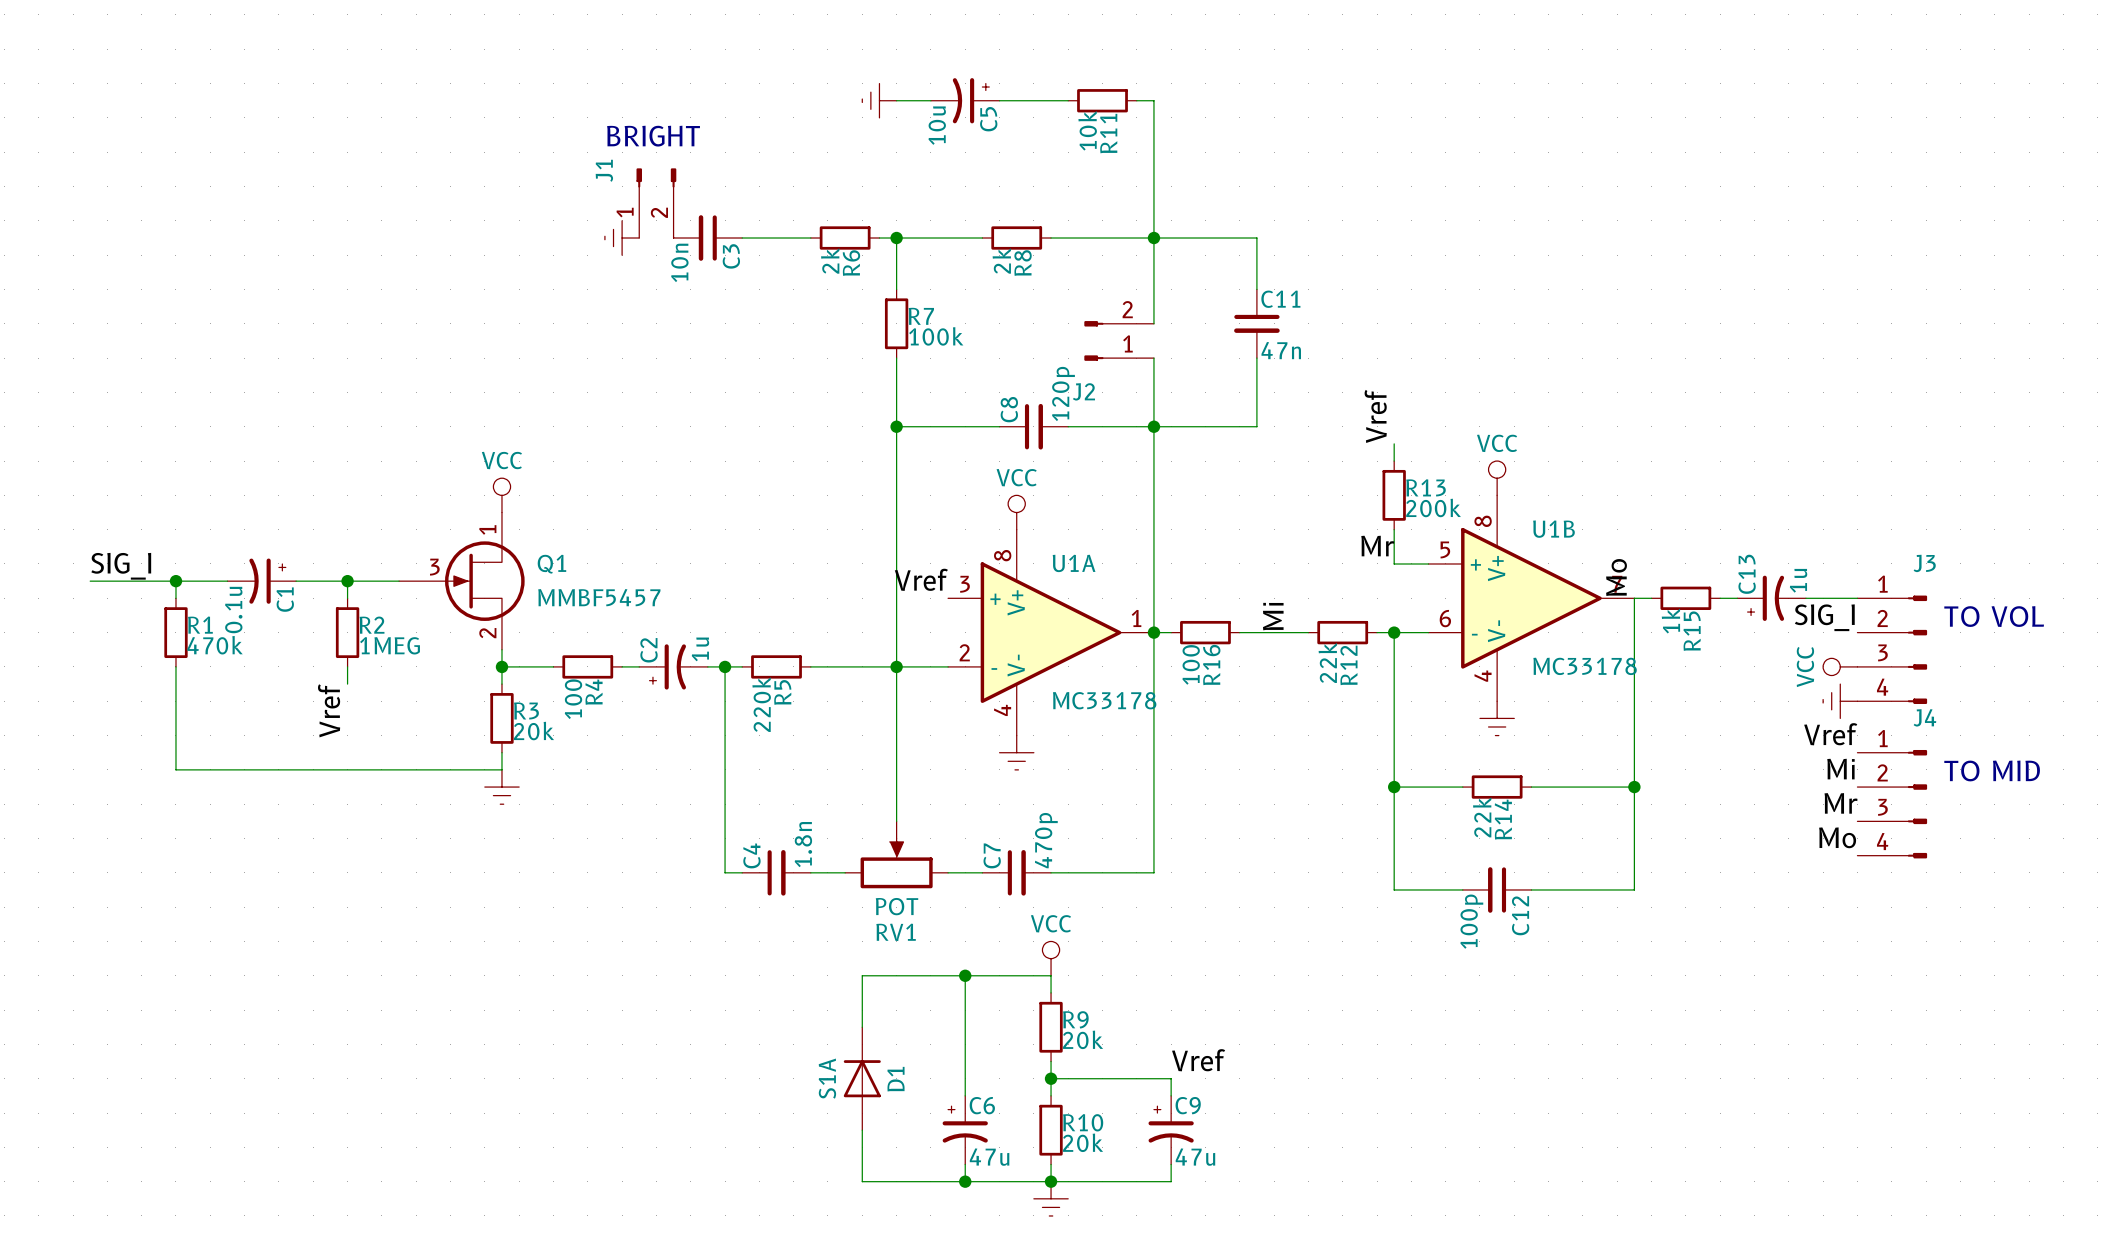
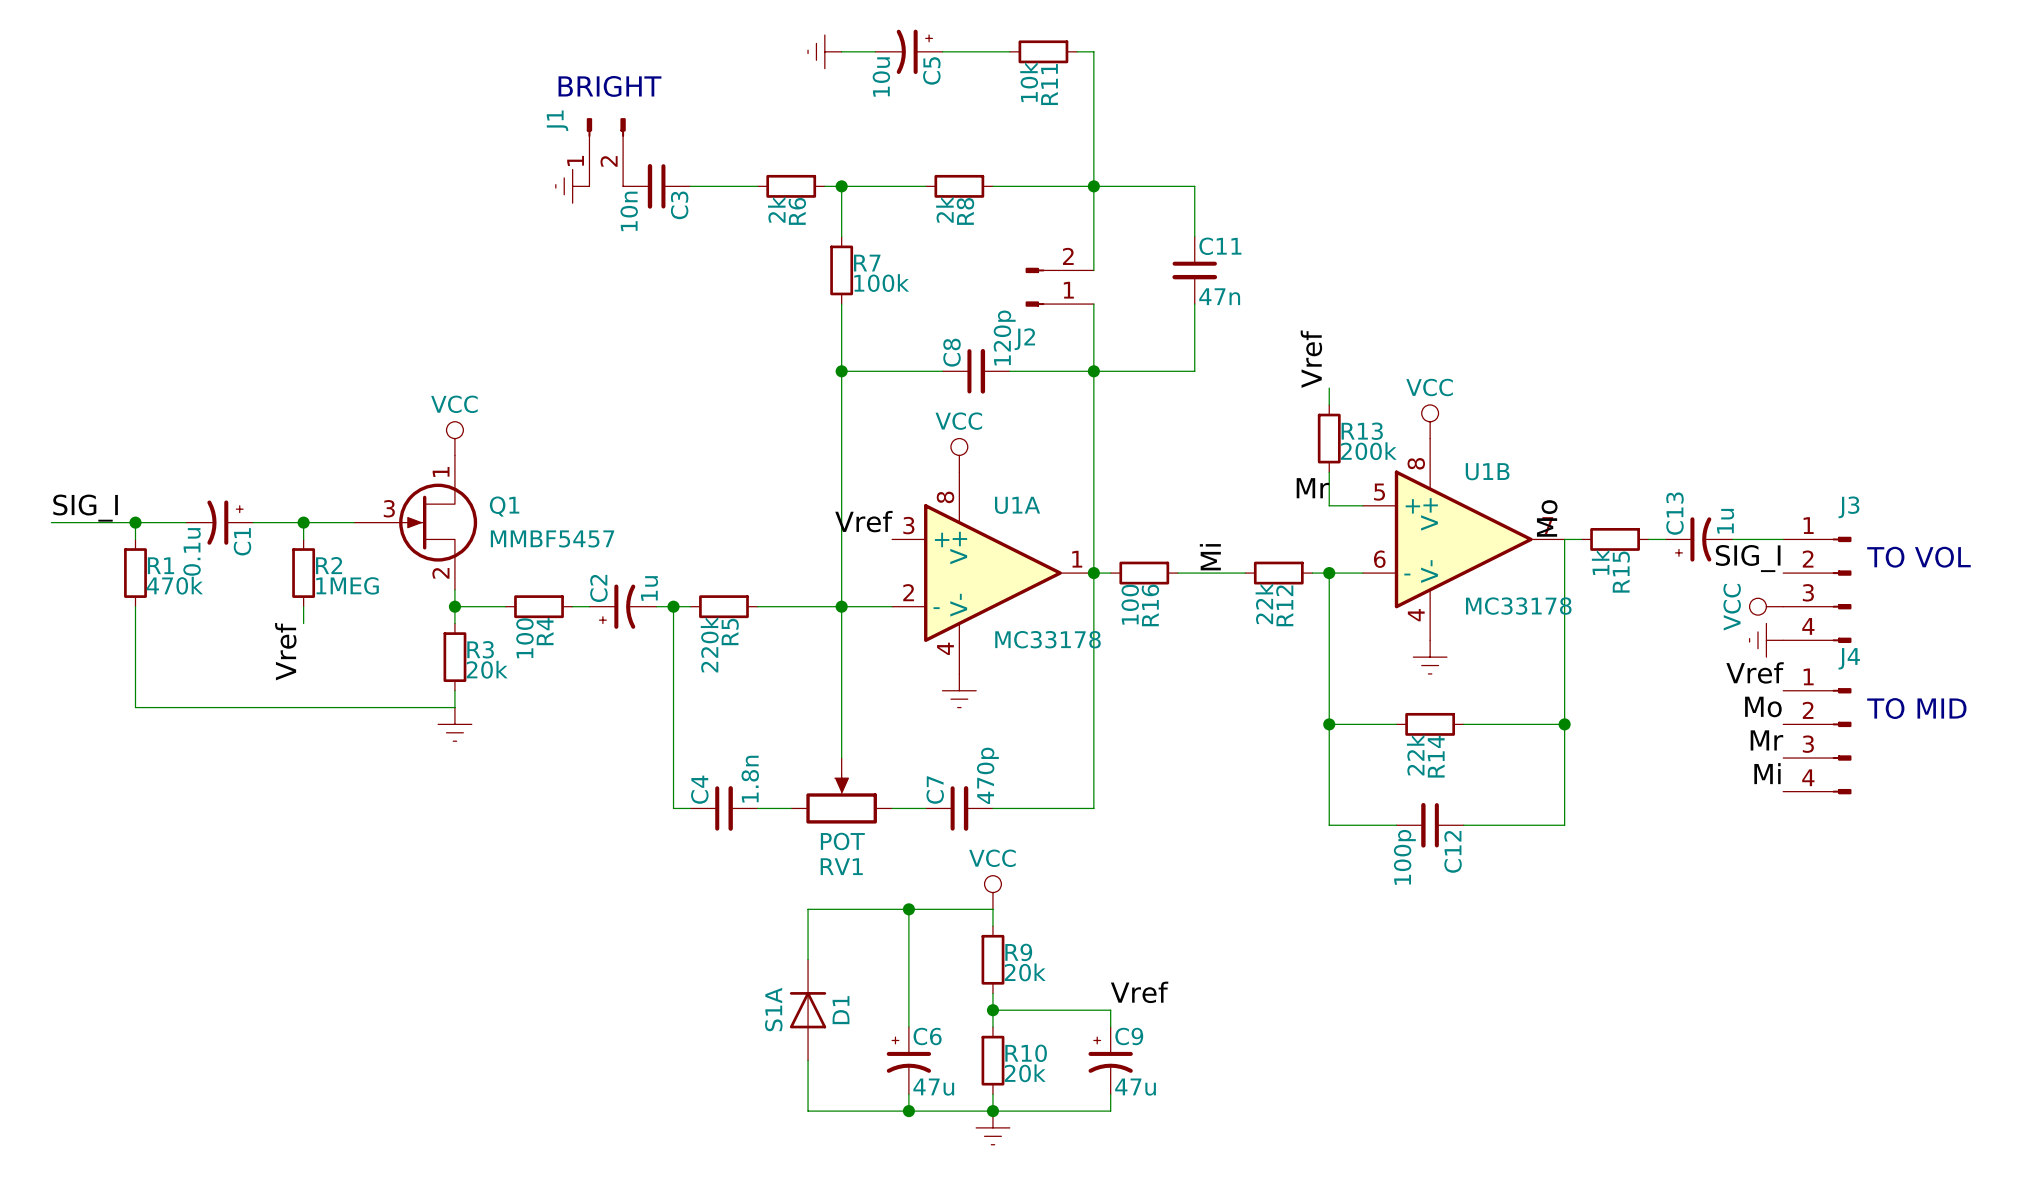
label: Mi (1840, 769) -> Mo (1763, 706)
label: Mo (1837, 837) -> Mi (1767, 773)

